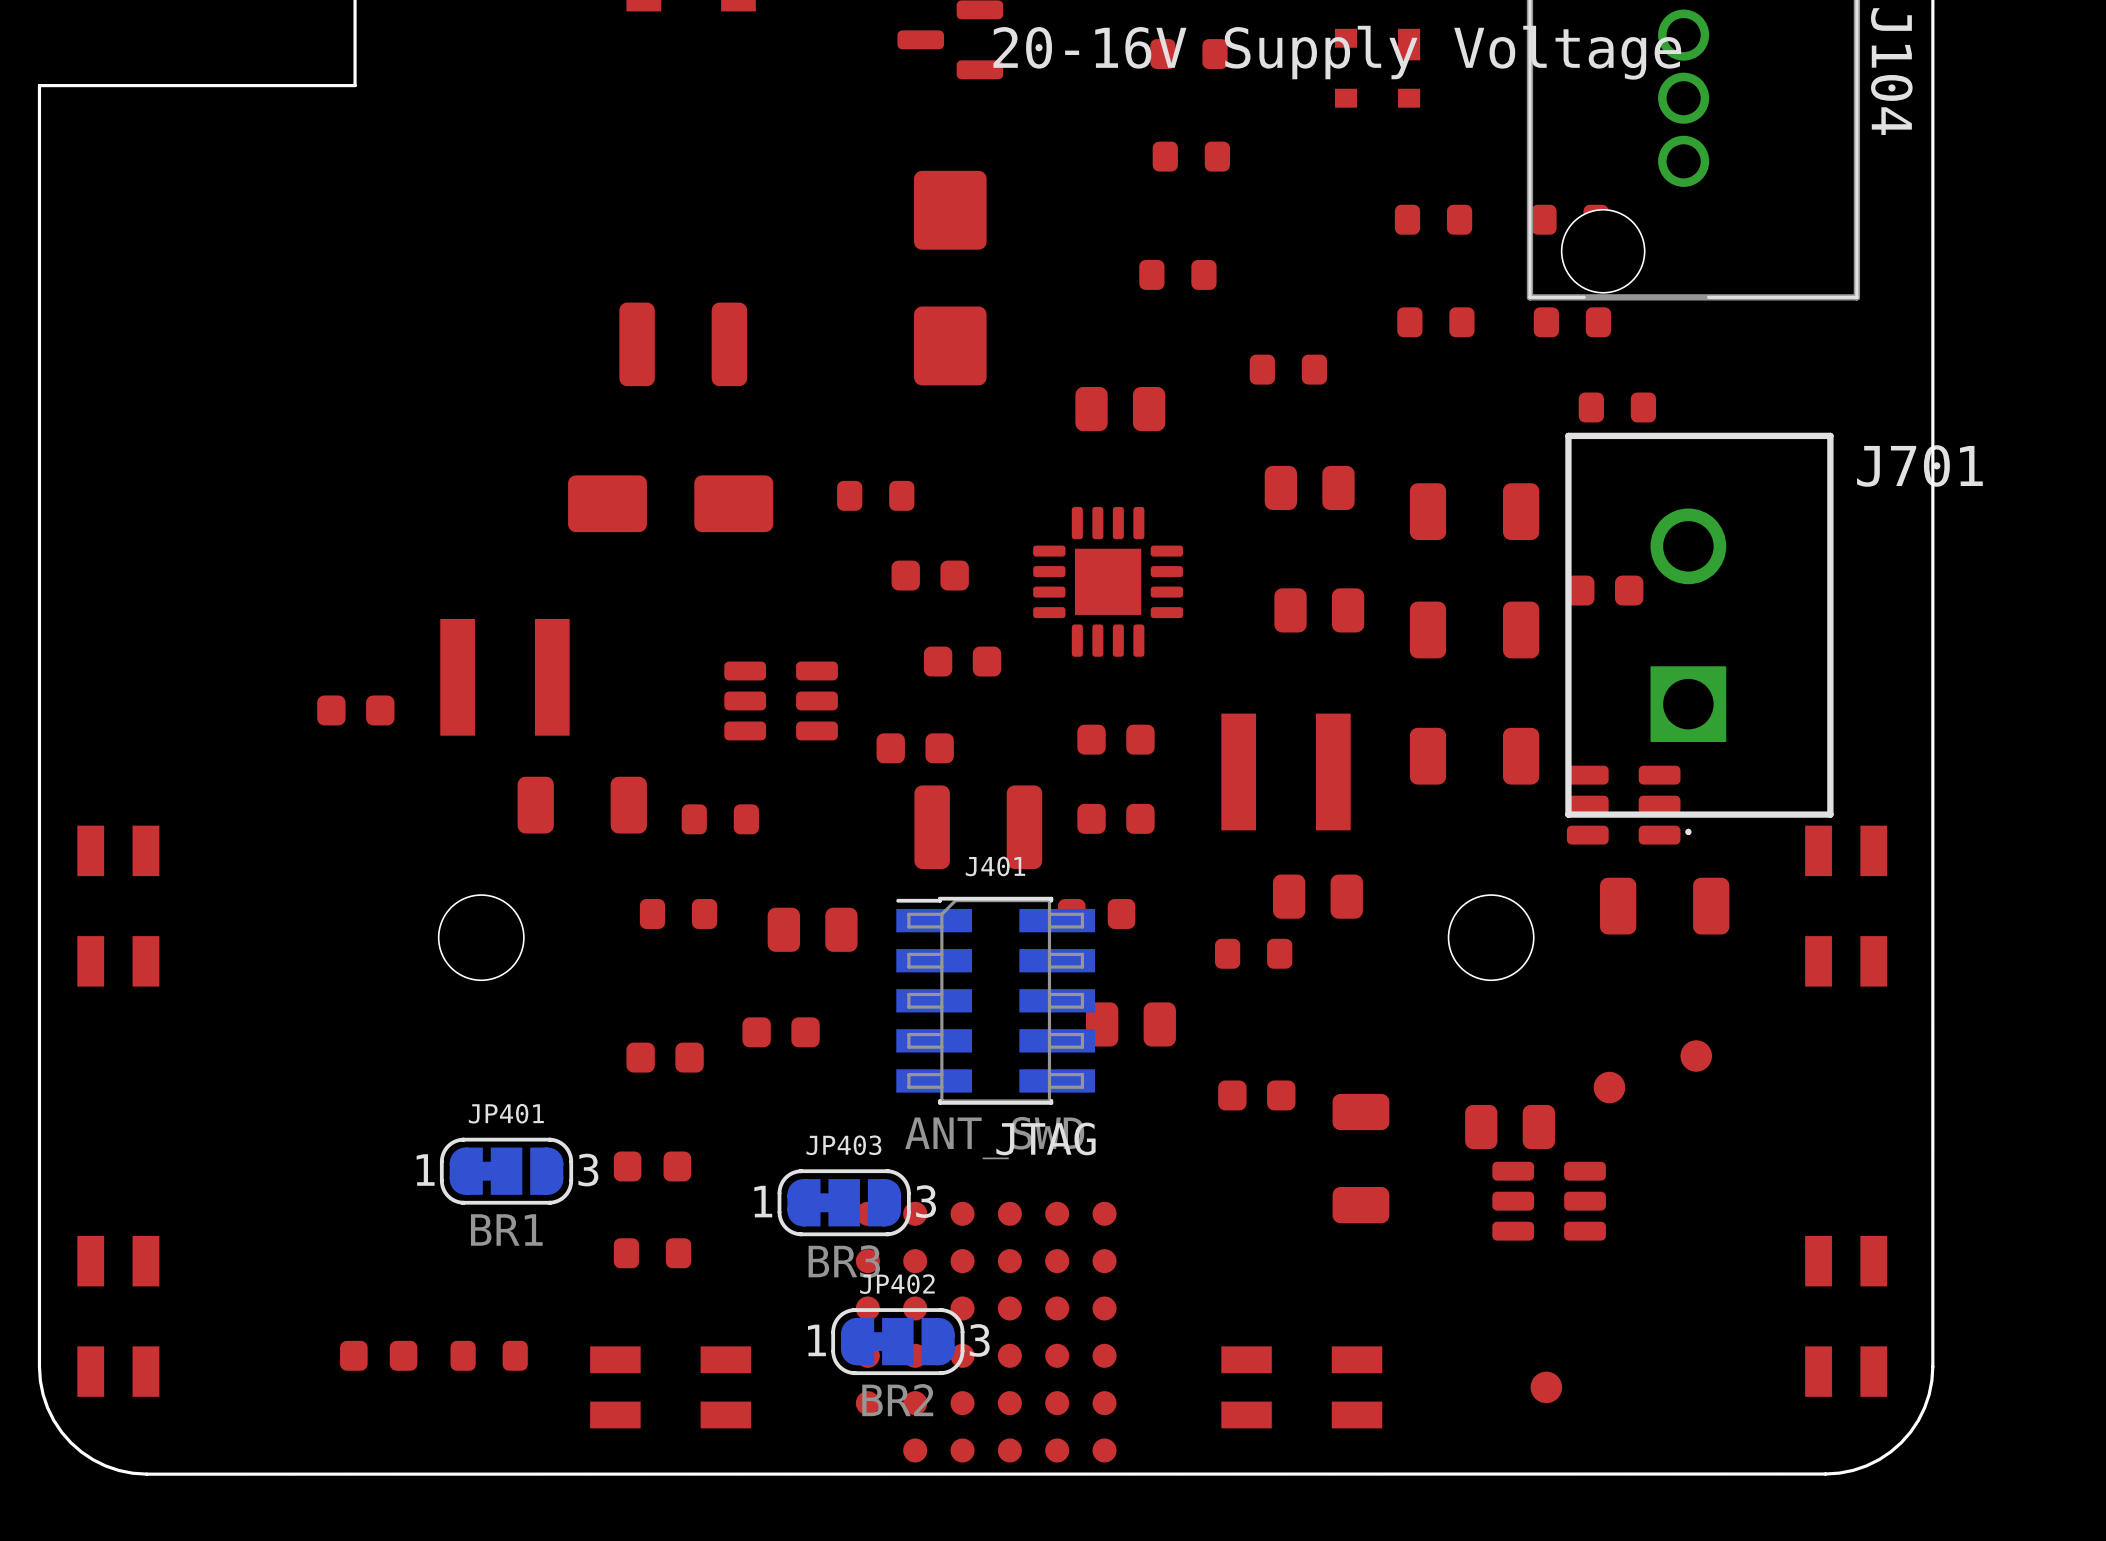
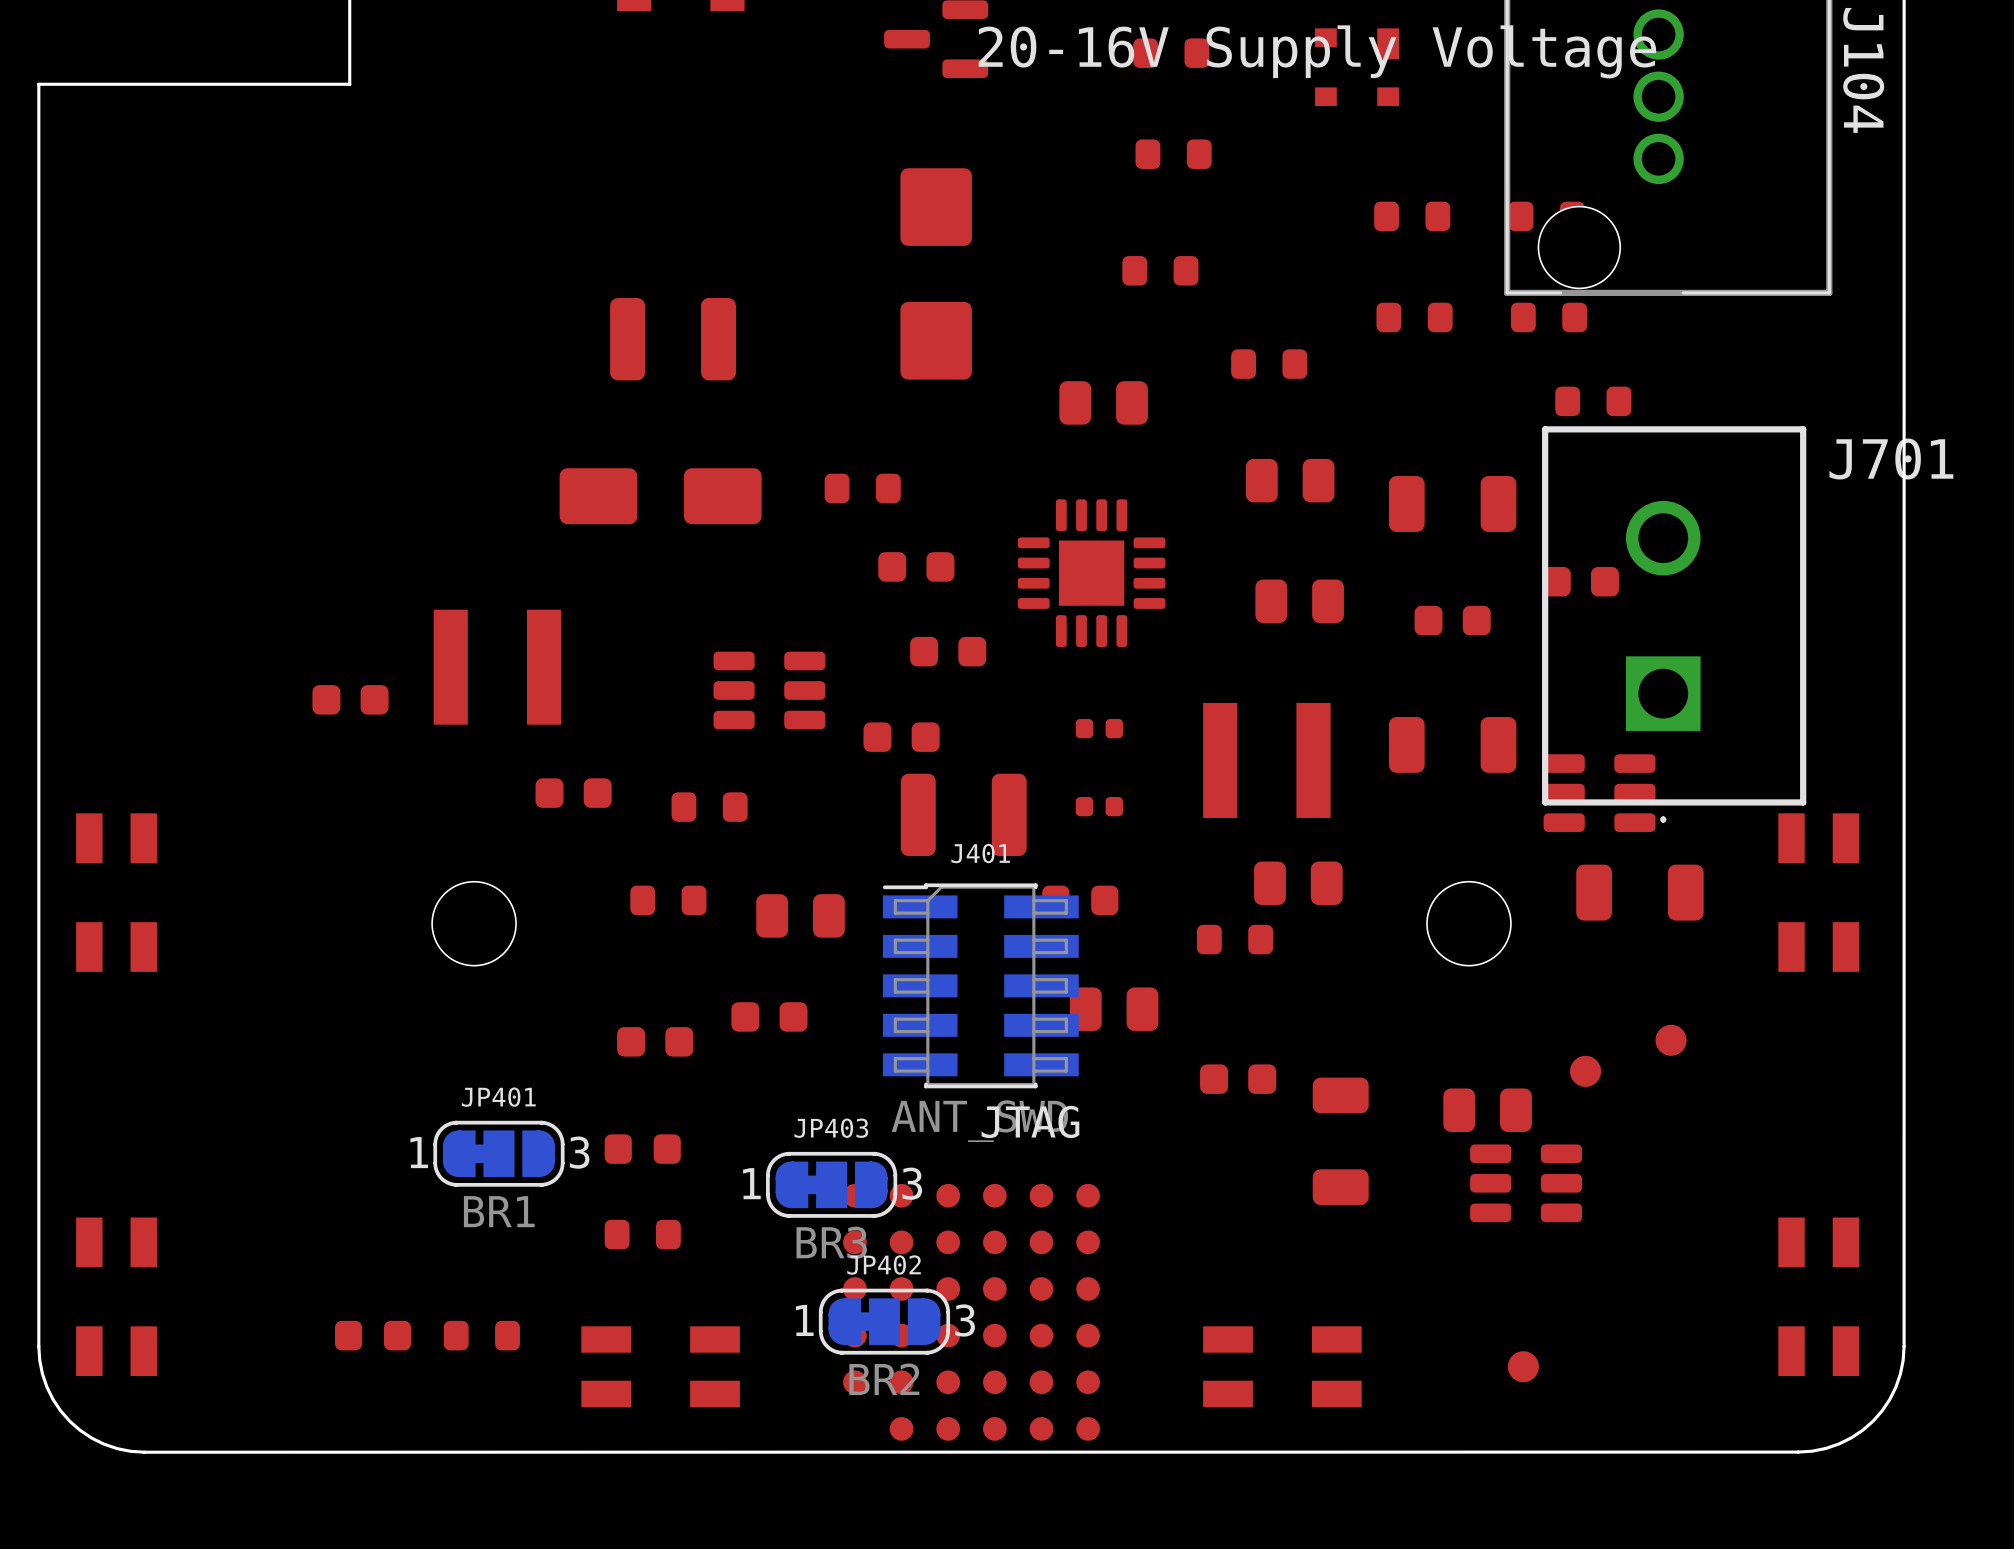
part footprint: [1409, 601, 1540, 659] -> [1414, 605, 1491, 636]
part footprint: [1077, 724, 1155, 755] -> [1075, 718, 1124, 739]
part footprint: [517, 776, 647, 834] -> [535, 778, 612, 808]
part footprint: [1077, 803, 1155, 834] -> [1075, 797, 1124, 817]

